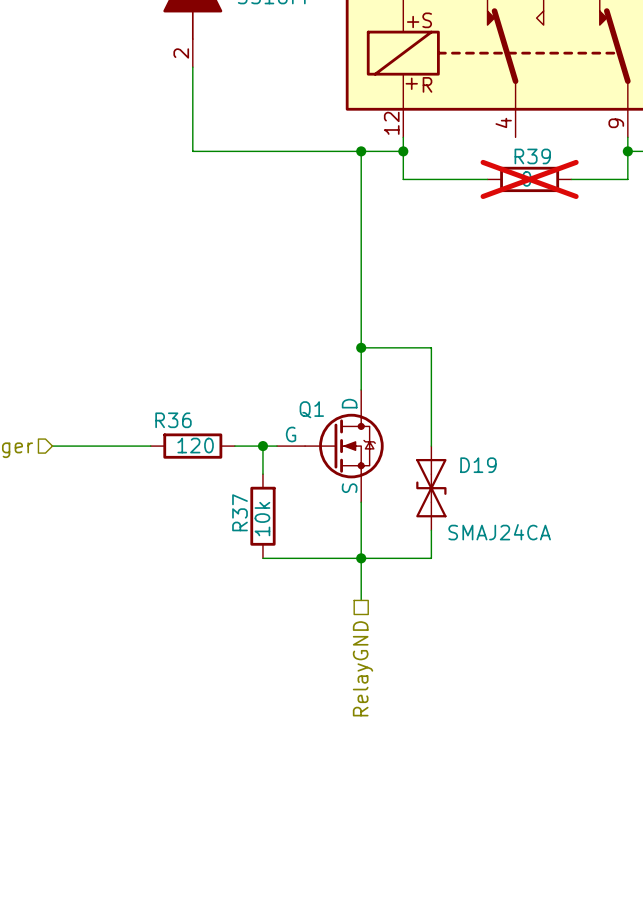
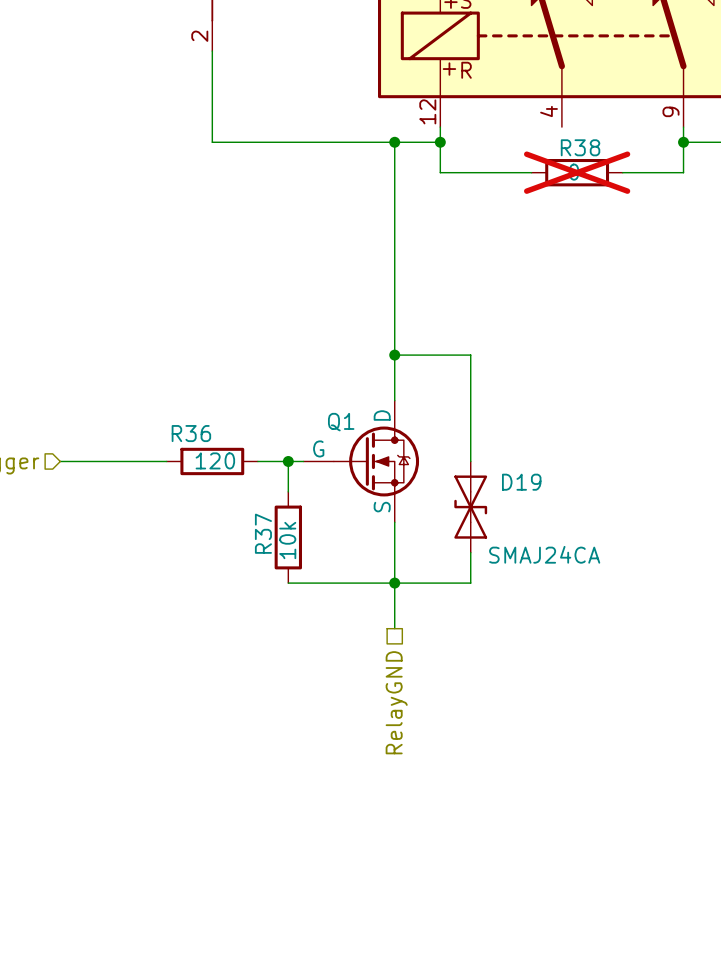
R39 name: R39 (532, 156) -> R38 (580, 147)

